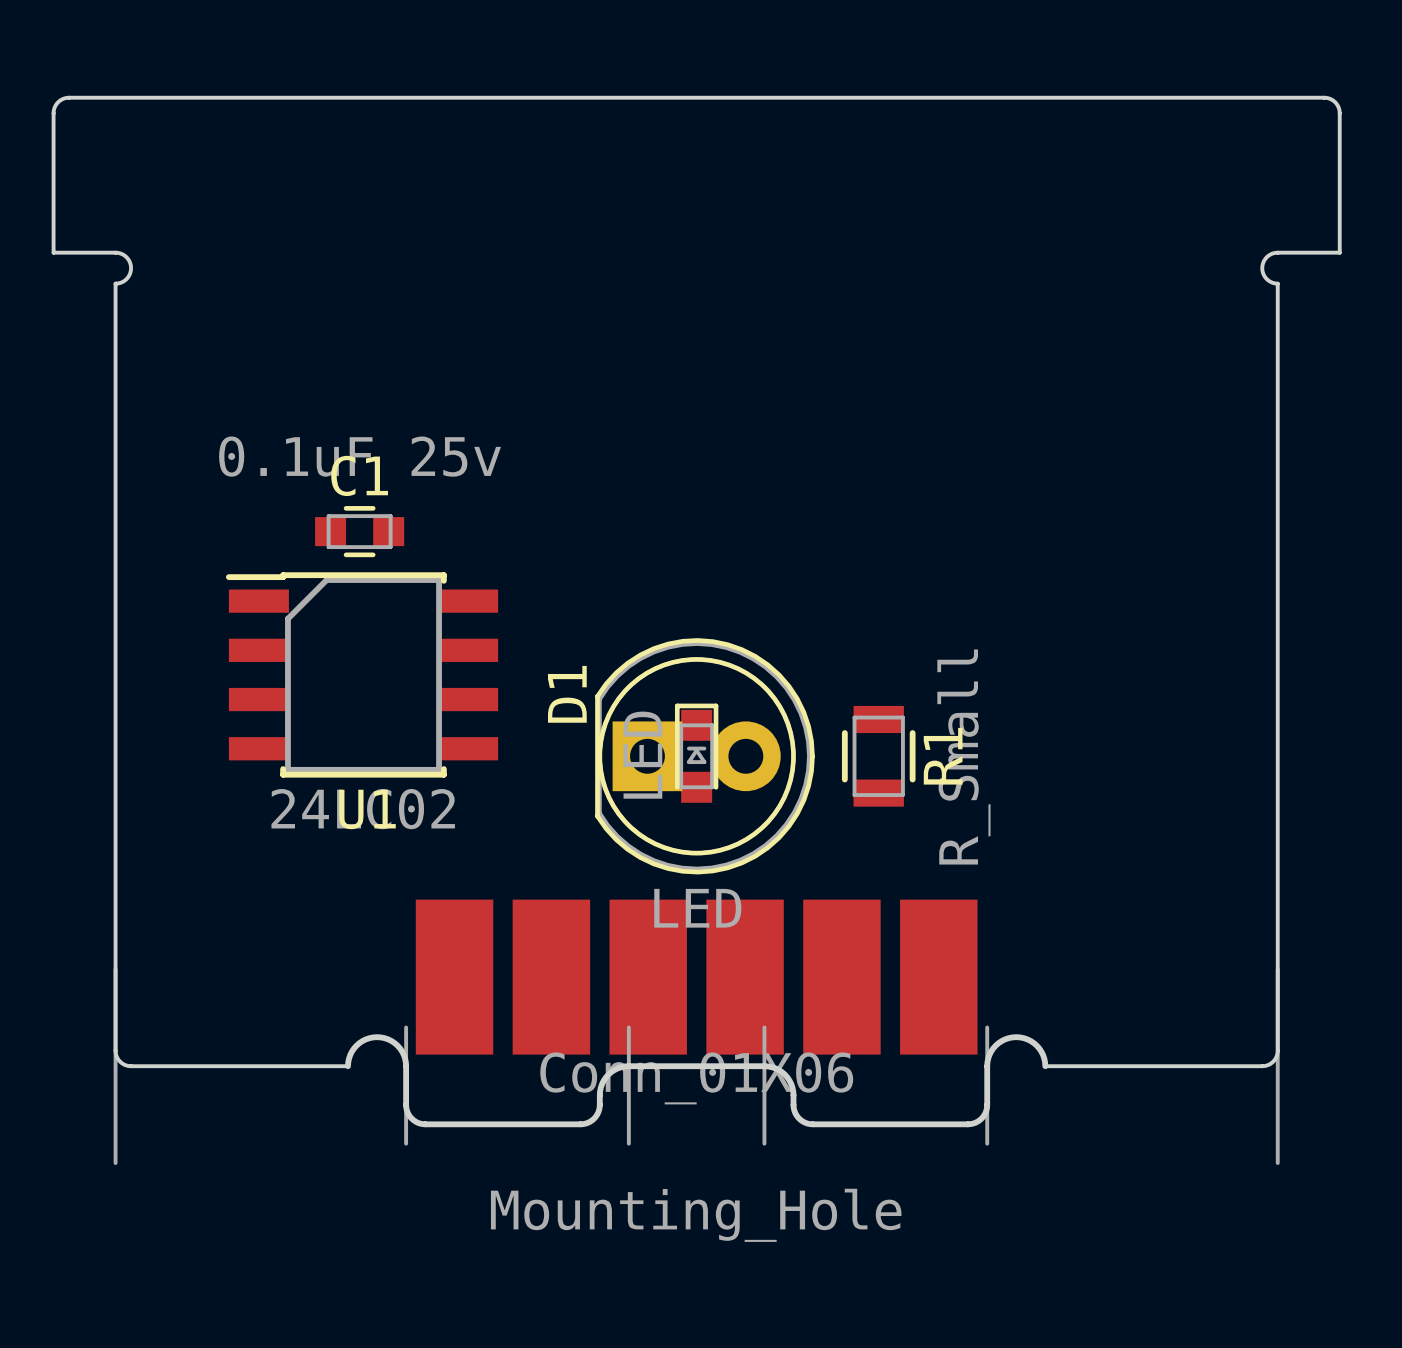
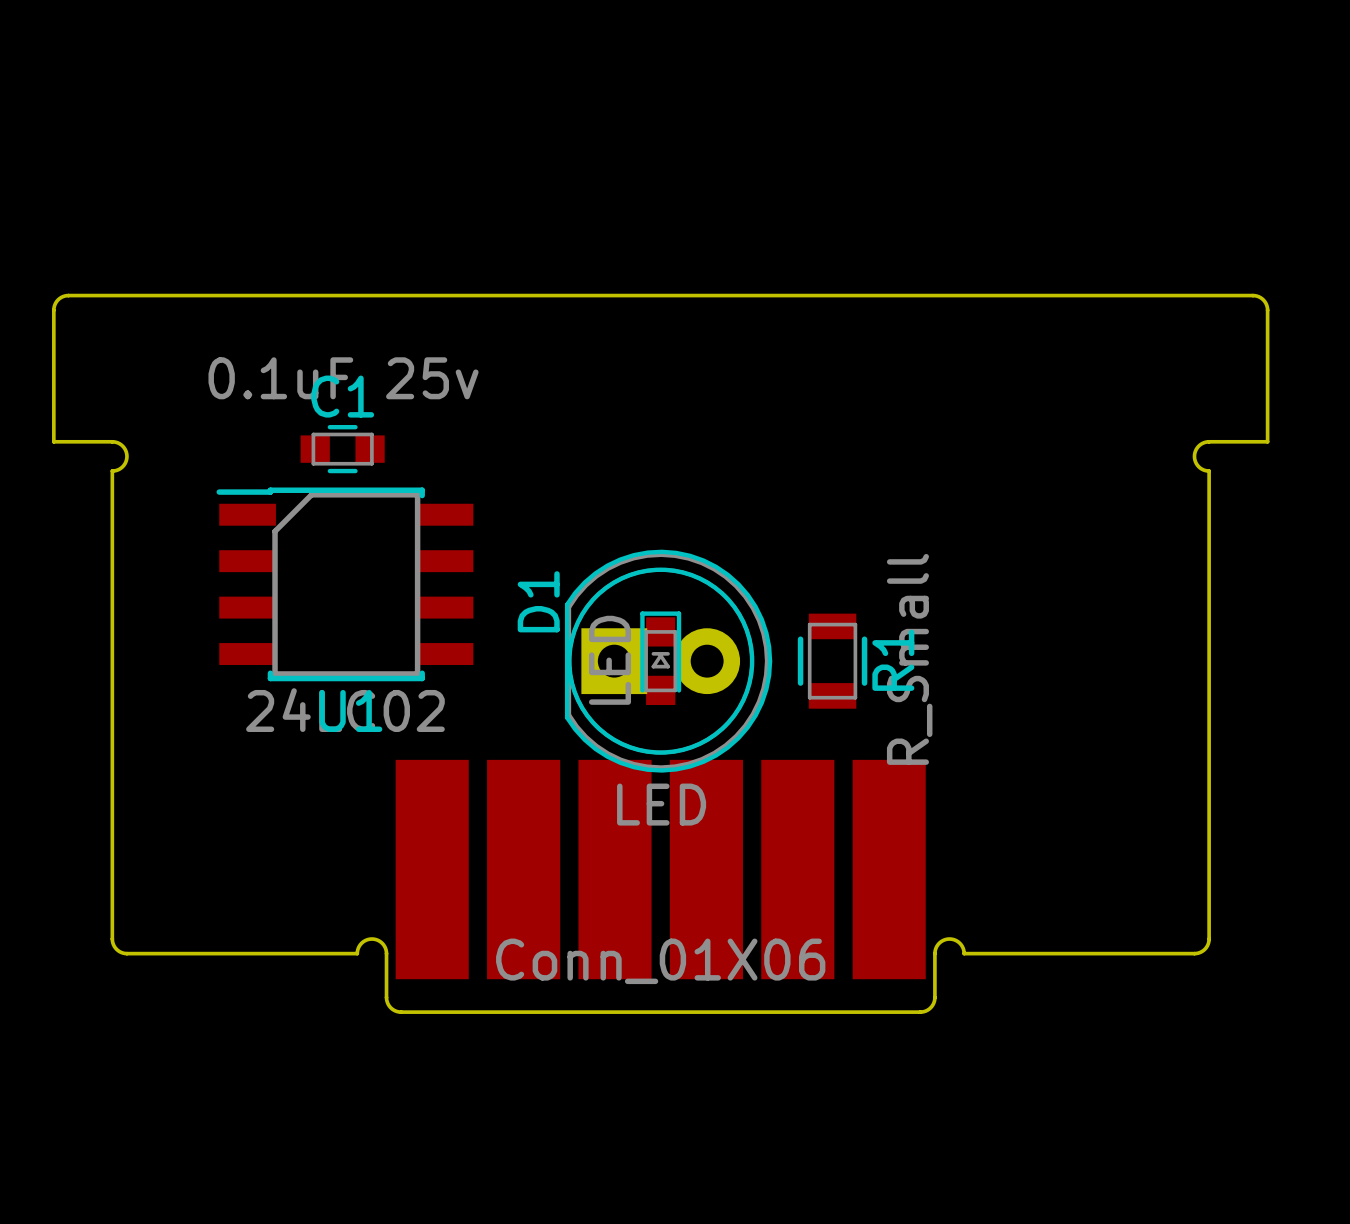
board edge: (115, 554) (115, 283) (126, 279) (130, 272) (130, 266) (126, 257) (117, 252) (53, 252) (53, 111) (58, 102) (67, 97) (1330, 98) (1336, 103) (1339, 113) (1339, 252) (1275, 252) (1266, 257) (1262, 266) (1265, 277) (1271, 282) (1277, 283) (1277, 554) -> (112, 471) (121, 468) (126, 460) (125, 450) (119, 443) (112, 441) (53, 441) (53, 308) (58, 299) (64, 296) (1256, 296) (1263, 299) (1267, 308) (1267, 441) (1209, 441) (1201, 443) (1195, 450) (1194, 460) (1200, 468) (1209, 471)
part footprint: [415, 899, 978, 1055] -> [395, 759, 926, 980]
drawing: [113, 967, 1280, 1165] -> none
board edge: none -> (331, 953) (357, 953) (360, 944) (366, 940) (373, 939) (380, 942) (386, 951) (387, 1001) (392, 1009) (401, 1012) (922, 1012) (930, 1007) (934, 1001) (935, 951) (940, 942) (947, 939) (955, 940) (961, 944) (964, 953) (989, 953)

